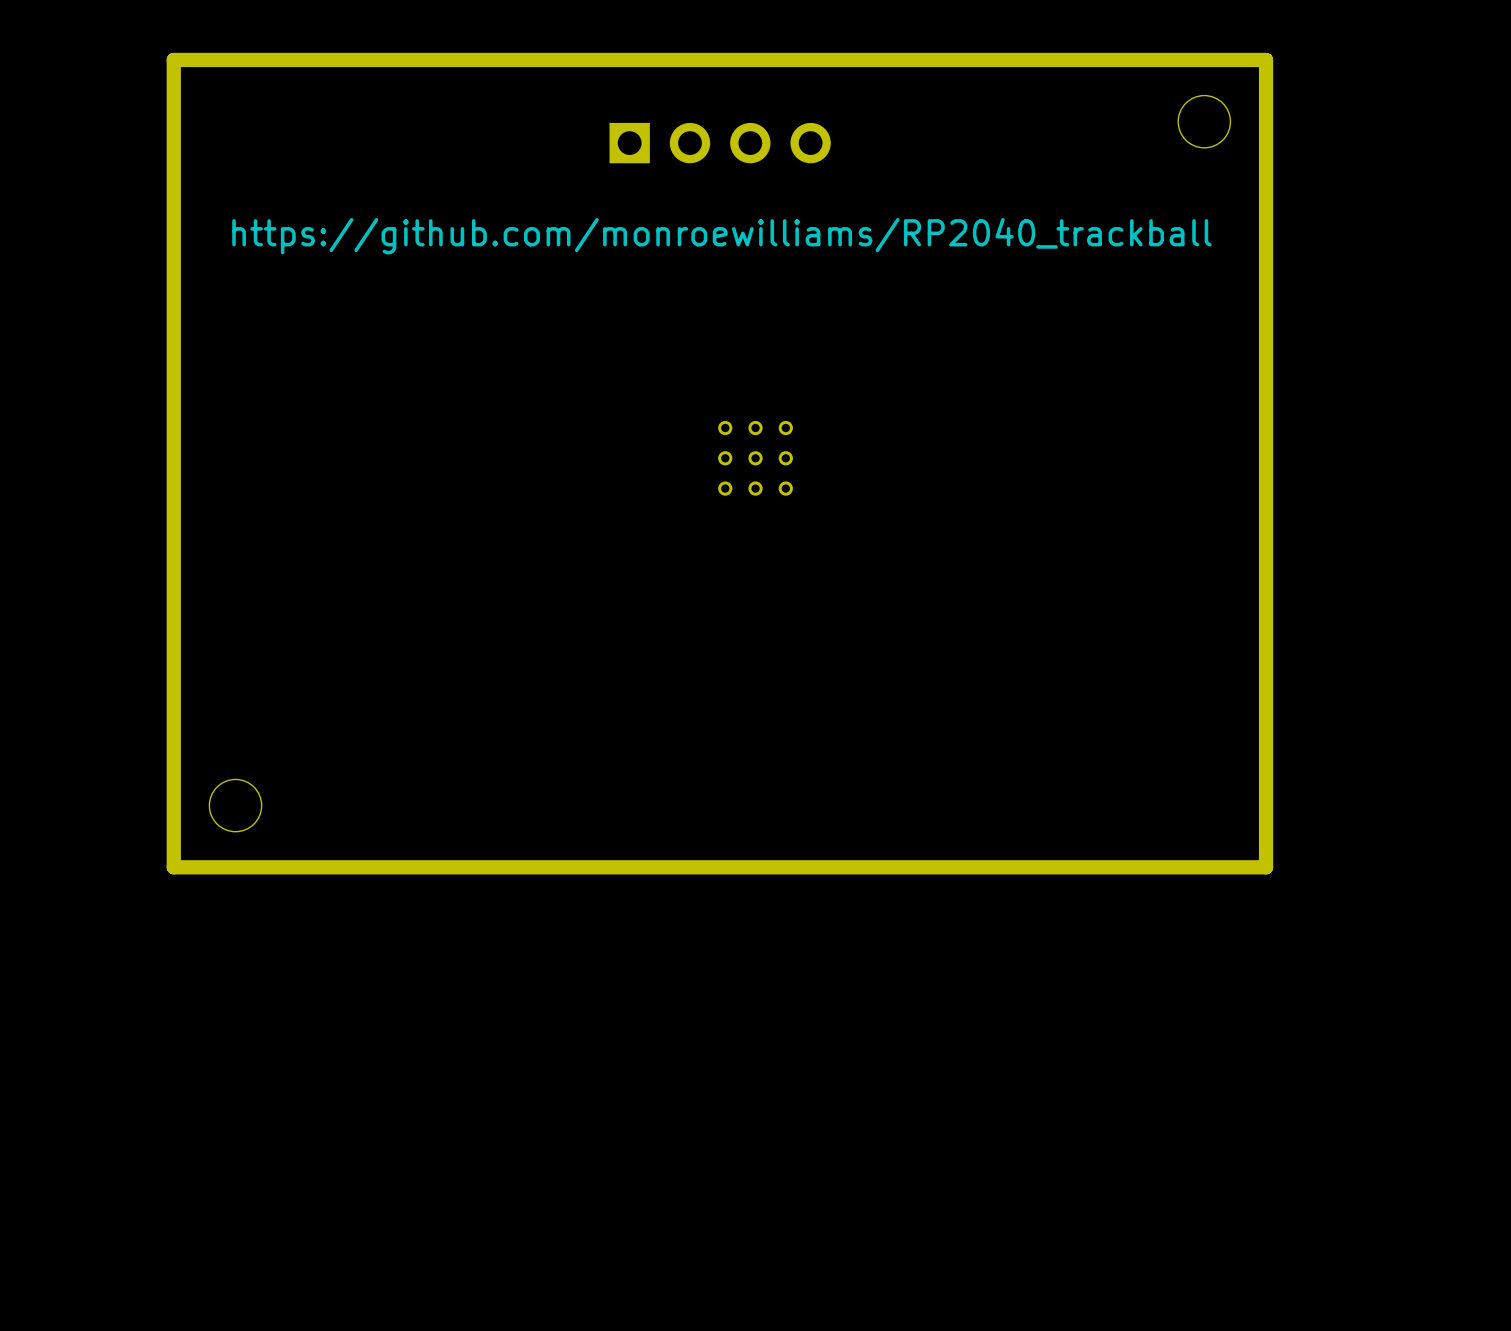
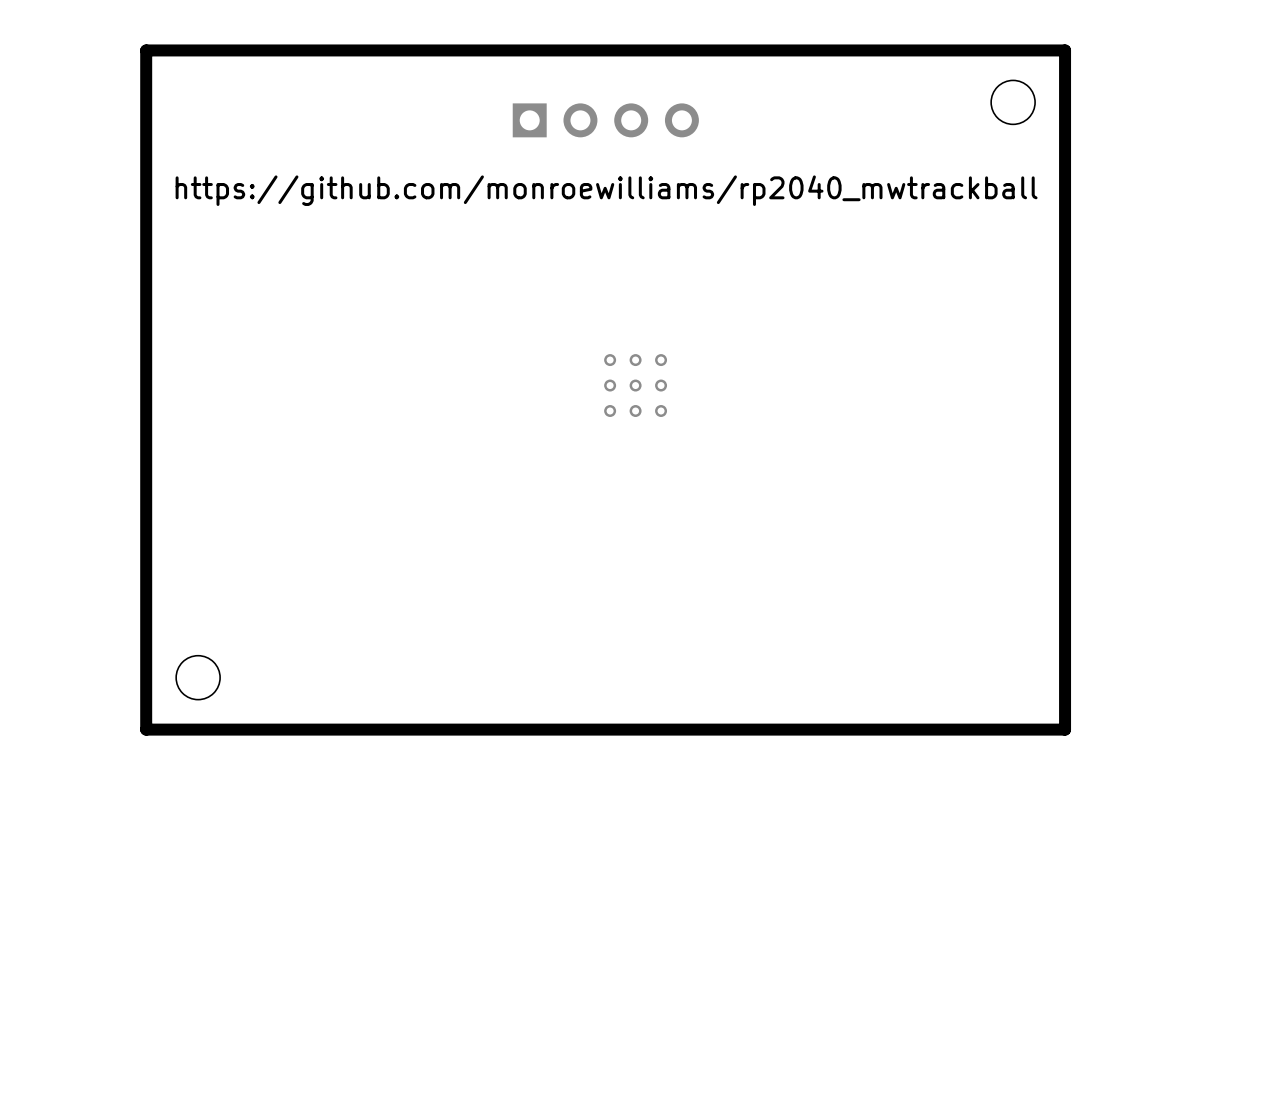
text: https://github.com/monroewilliams/RP2040_trackball (721, 236) -> https://github.com/monroewilliams/rp2040_mwtrackball (606, 190)

